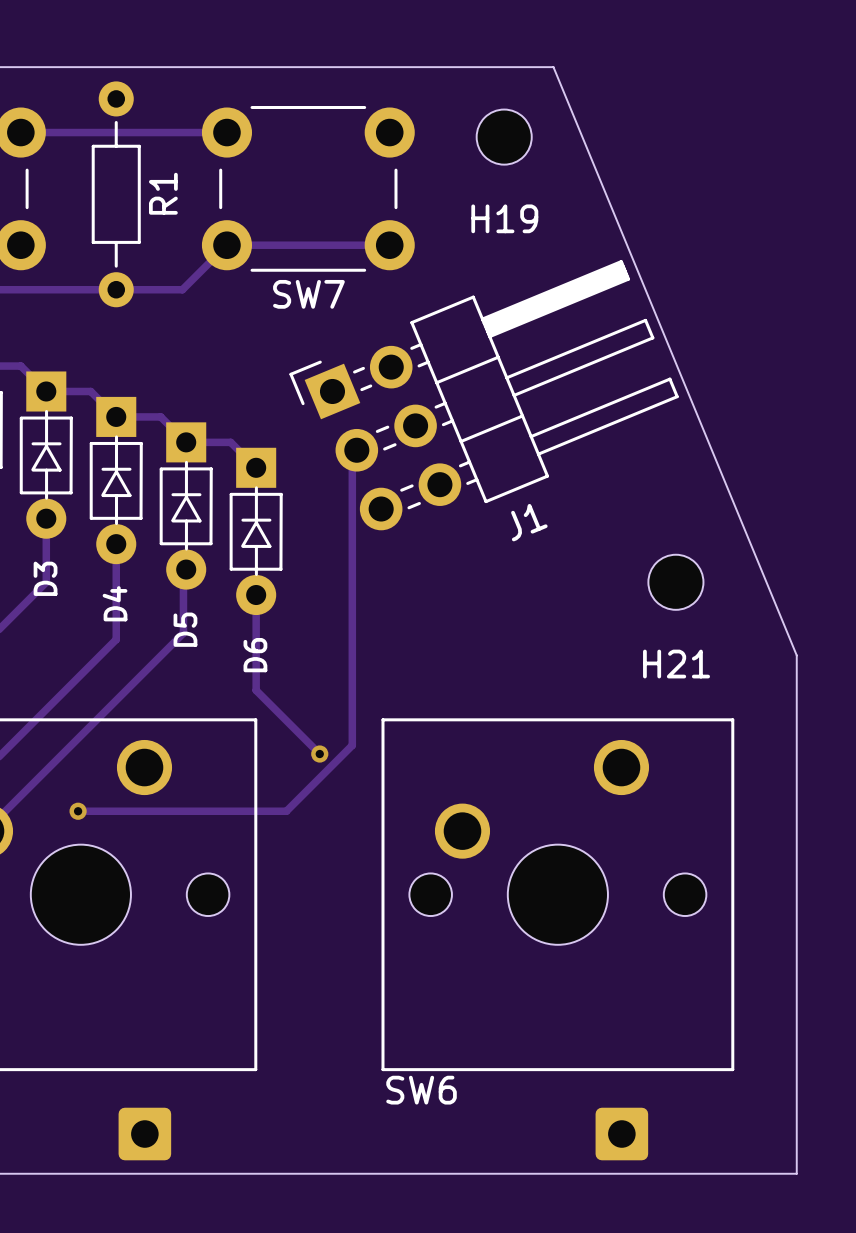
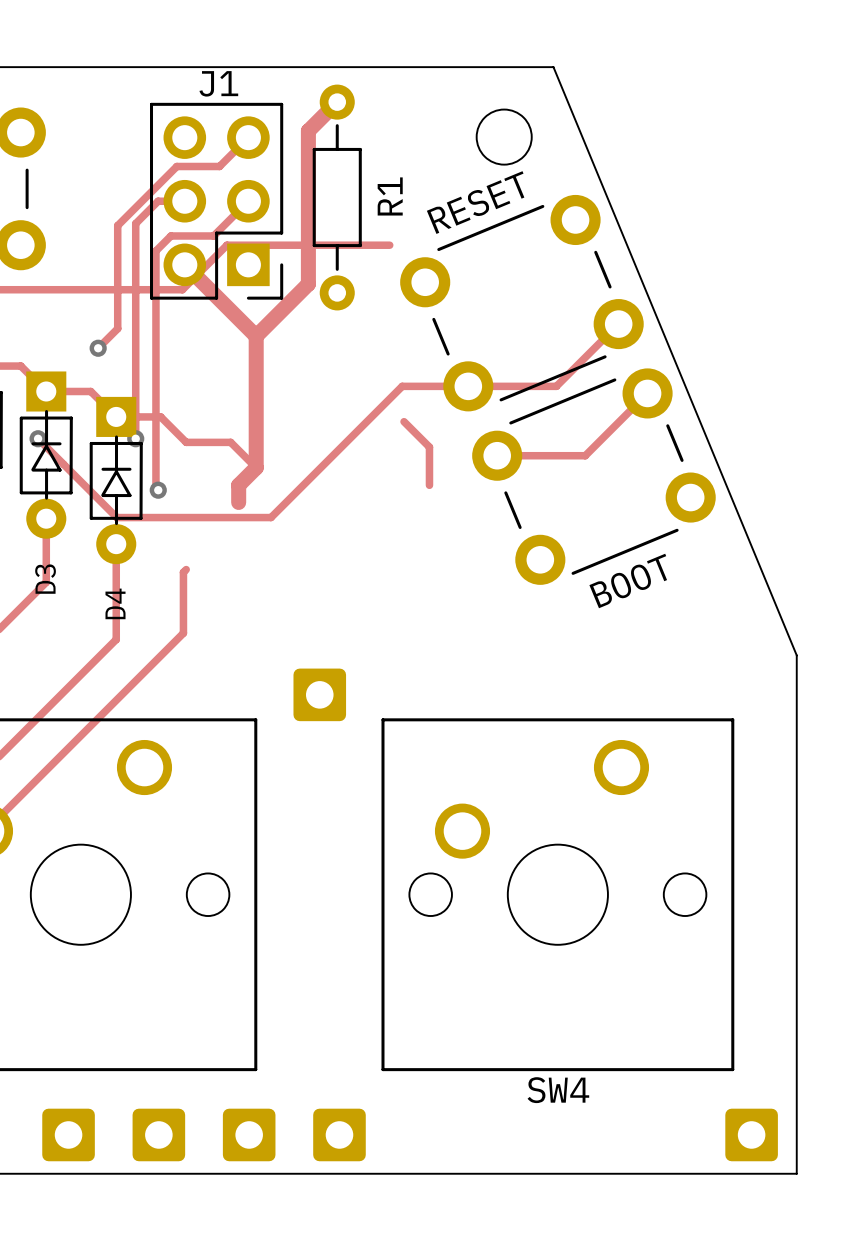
track: none -> (337, 102) (308, 130) (308, 284) (256, 336)
track: (20, 132) (226, 132) -> none
track: none -> (248, 137) (219, 166) (176, 166) (117, 225) (117, 328) (98, 348)
SW7: (308, 188) -> none
R1 name position: R1 (163, 193) -> R1 (390, 196)
R1 position: (116, 194) -> (337, 197)
track: none -> (184, 201) (158, 201) (135, 223) (135, 438)
track: none -> (248, 201) (213, 235) (170, 235) (155, 250) (155, 487) (158, 490)
text: none -> RESET (475, 202)
H19 name: H19 (504, 218) -> none
J1 footprint: [289, 260, 679, 531] -> [150, 102, 284, 300]
track: none -> (184, 264) (256, 336)
part: none -> (521, 303)
track: none -> (618, 324) (556, 386) (402, 386) (271, 517) (116, 517) (38, 438)
track: none -> (256, 336) (256, 467) (238, 485) (238, 502)
via: none -> (98, 348)
track: none -> (647, 393) (585, 455) (489, 455)
track: none -> (404, 421) (429, 447) (429, 485)
via: none -> (38, 438)
via: none -> (135, 438)
track: (356, 450) (352, 454) (352, 745) (286, 811) (78, 811) -> none
part: none -> (593, 476)
via: none -> (158, 490)
D5: (186, 505) -> none
J1 name position: J1 (529, 522) -> J1 (218, 83)
D6: (256, 531) -> none
text: none -> BOOT (628, 580)
H21: (675, 582) -> none
track: (256, 595) (256, 690) (319, 754) -> none
part: none -> (319, 694)
via: (319, 754) -> none
via: (78, 811) -> none
SW6 name: SW6 (421, 1090) -> SW4 (558, 1090)
part: none -> (68, 1134)
part position: (144, 1134) -> (158, 1134)
part: none -> (249, 1134)
part: none -> (339, 1134)
part position: (621, 1134) -> (751, 1134)

